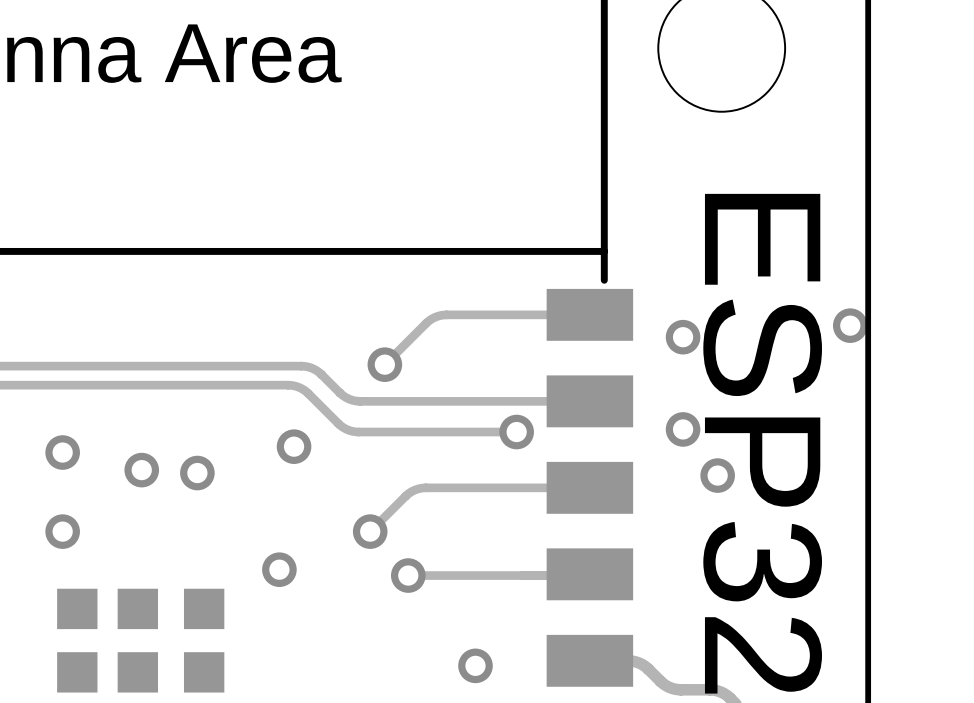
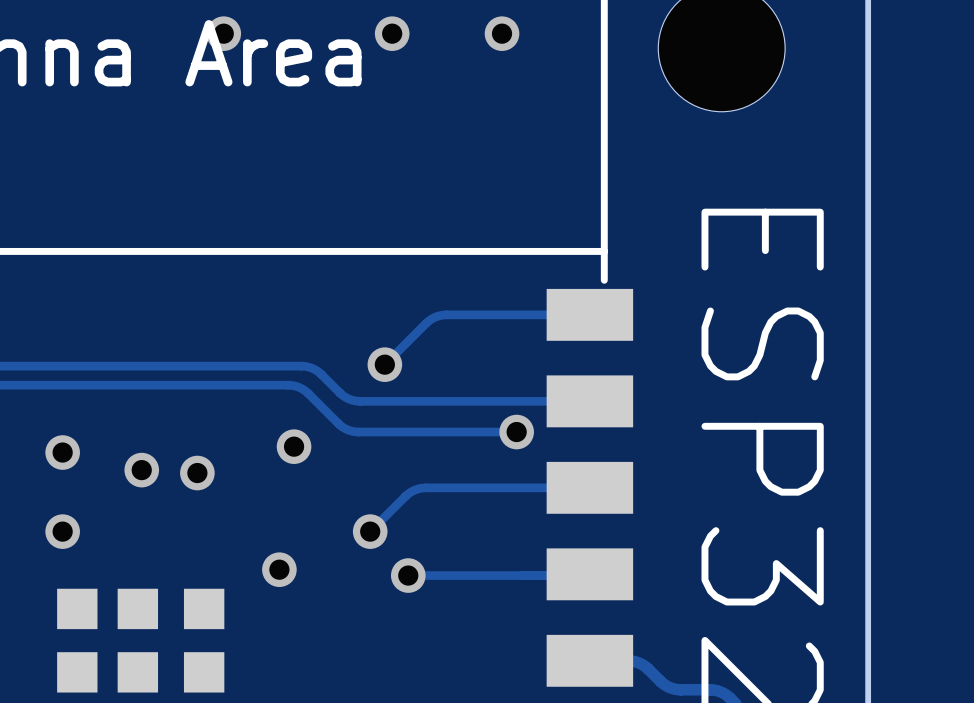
via: none -> (223, 33)
via: none -> (392, 33)
via: none -> (502, 33)
via: (850, 325) -> none
via: (683, 337) -> none
via: (683, 429) -> none
via: (717, 475) -> none
via: (475, 665) -> none

